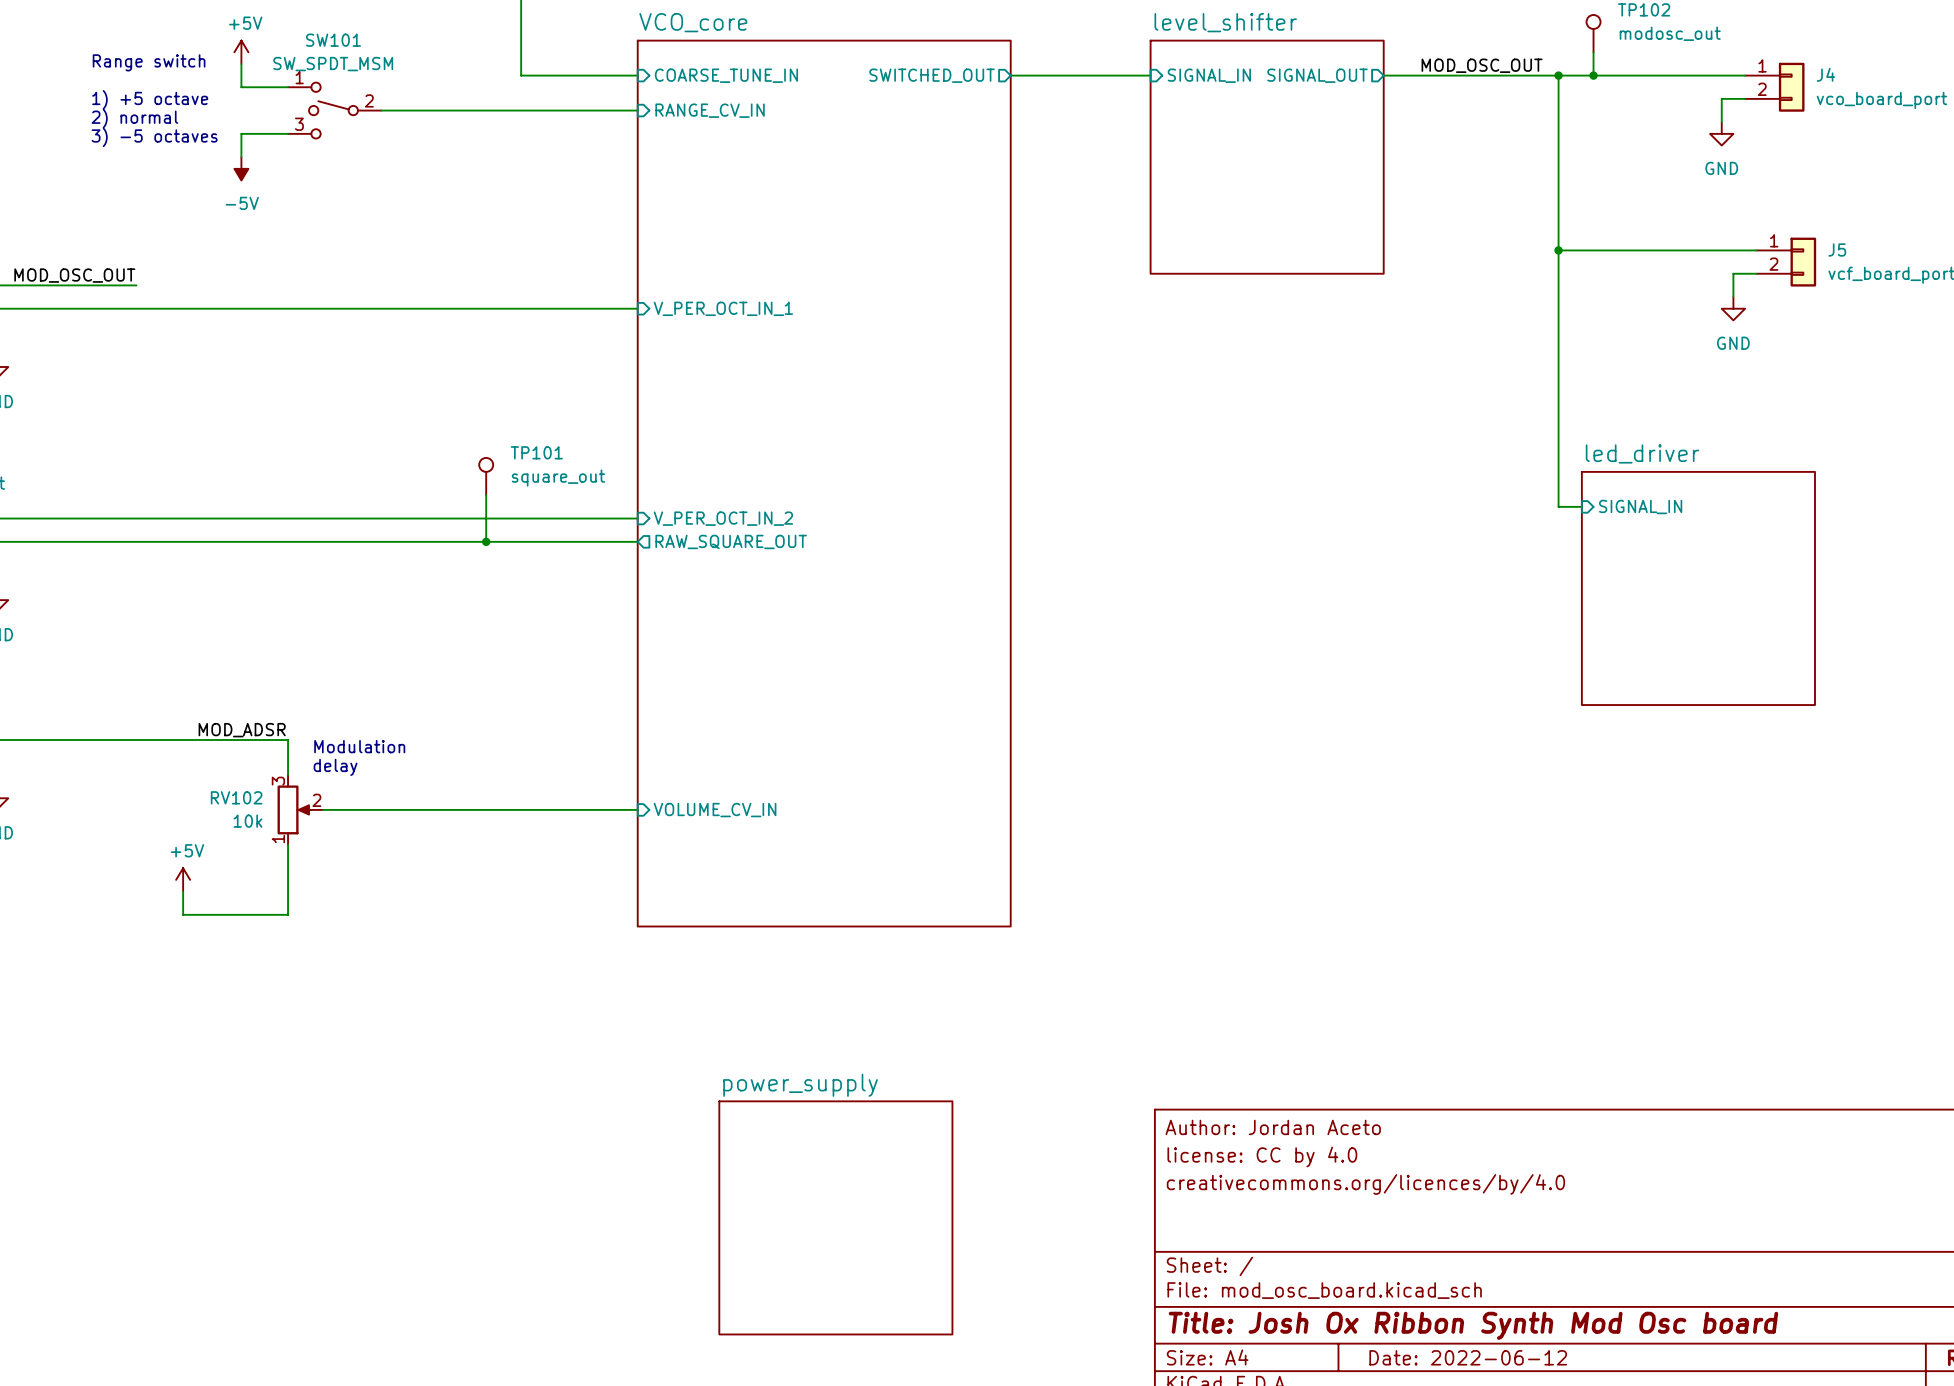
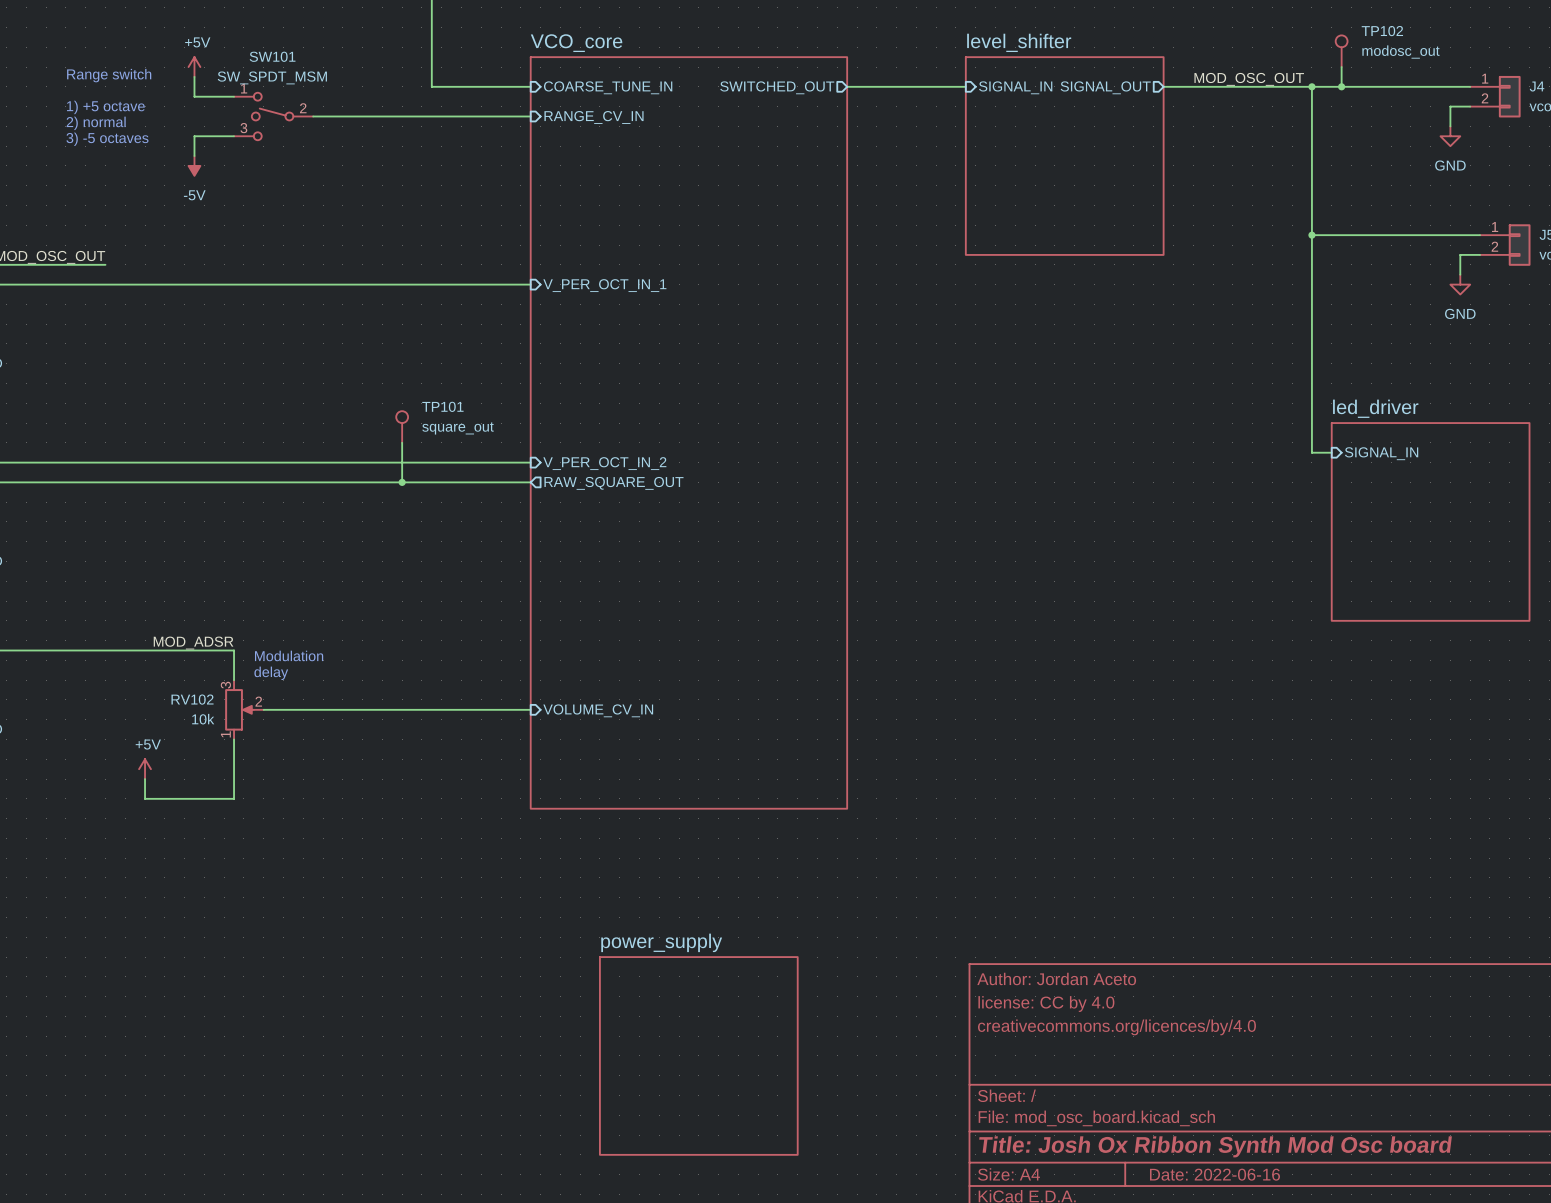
title block: Date: 2022-06-12 (1468, 1357) -> Date: 2022-06-16 (1214, 1174)

